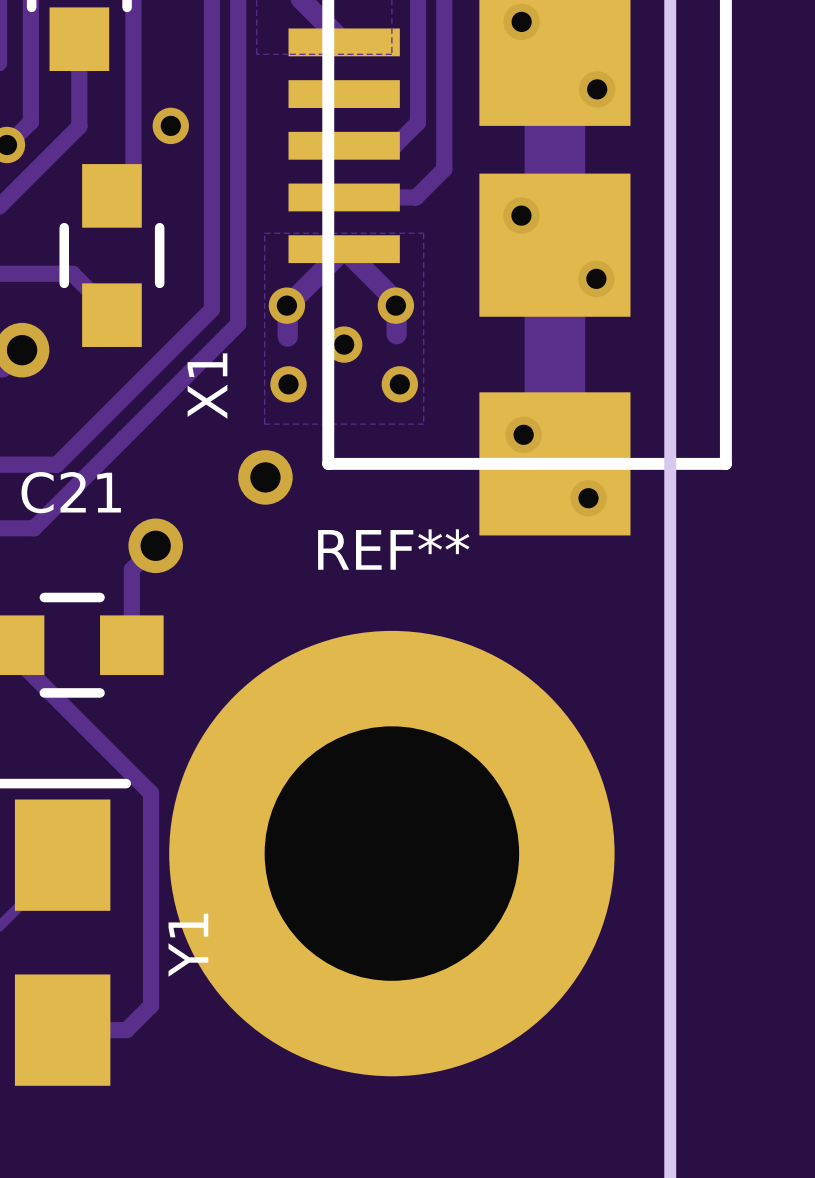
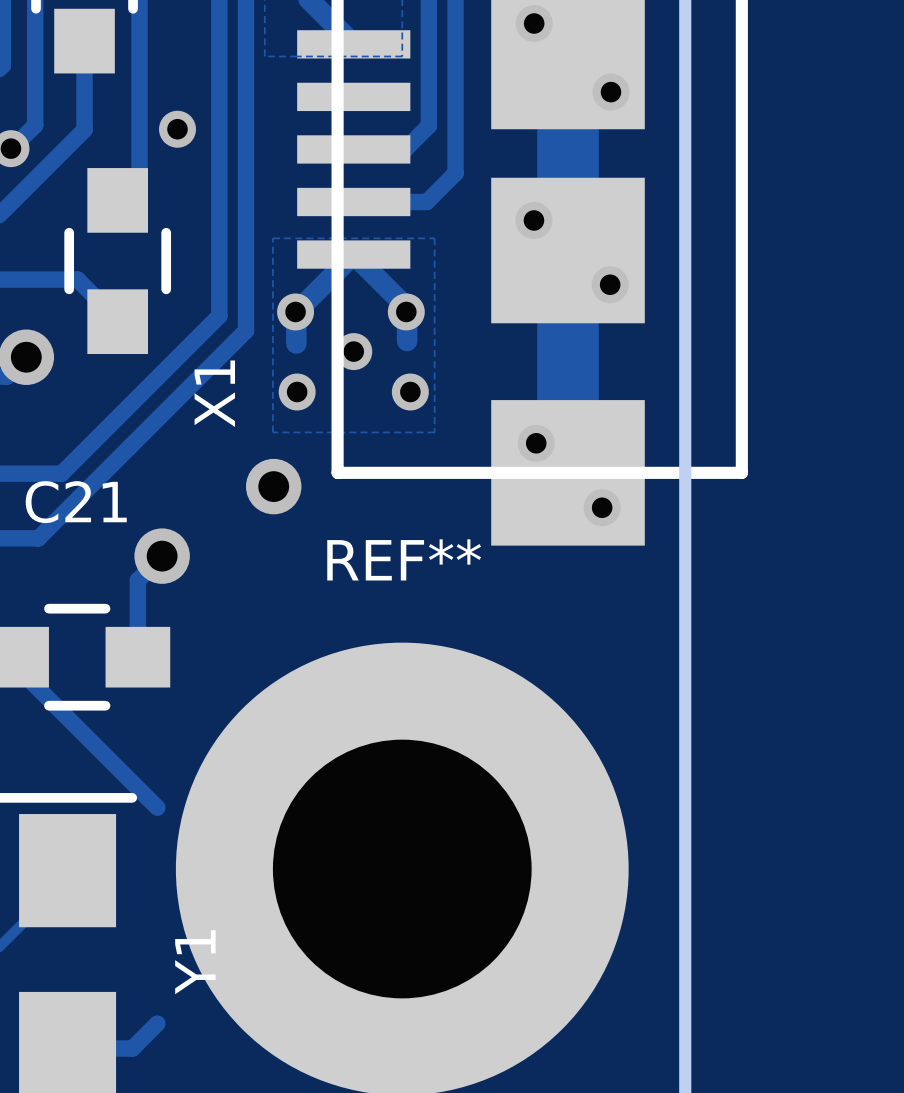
track: (151, 793) (151, 1005) -> none

